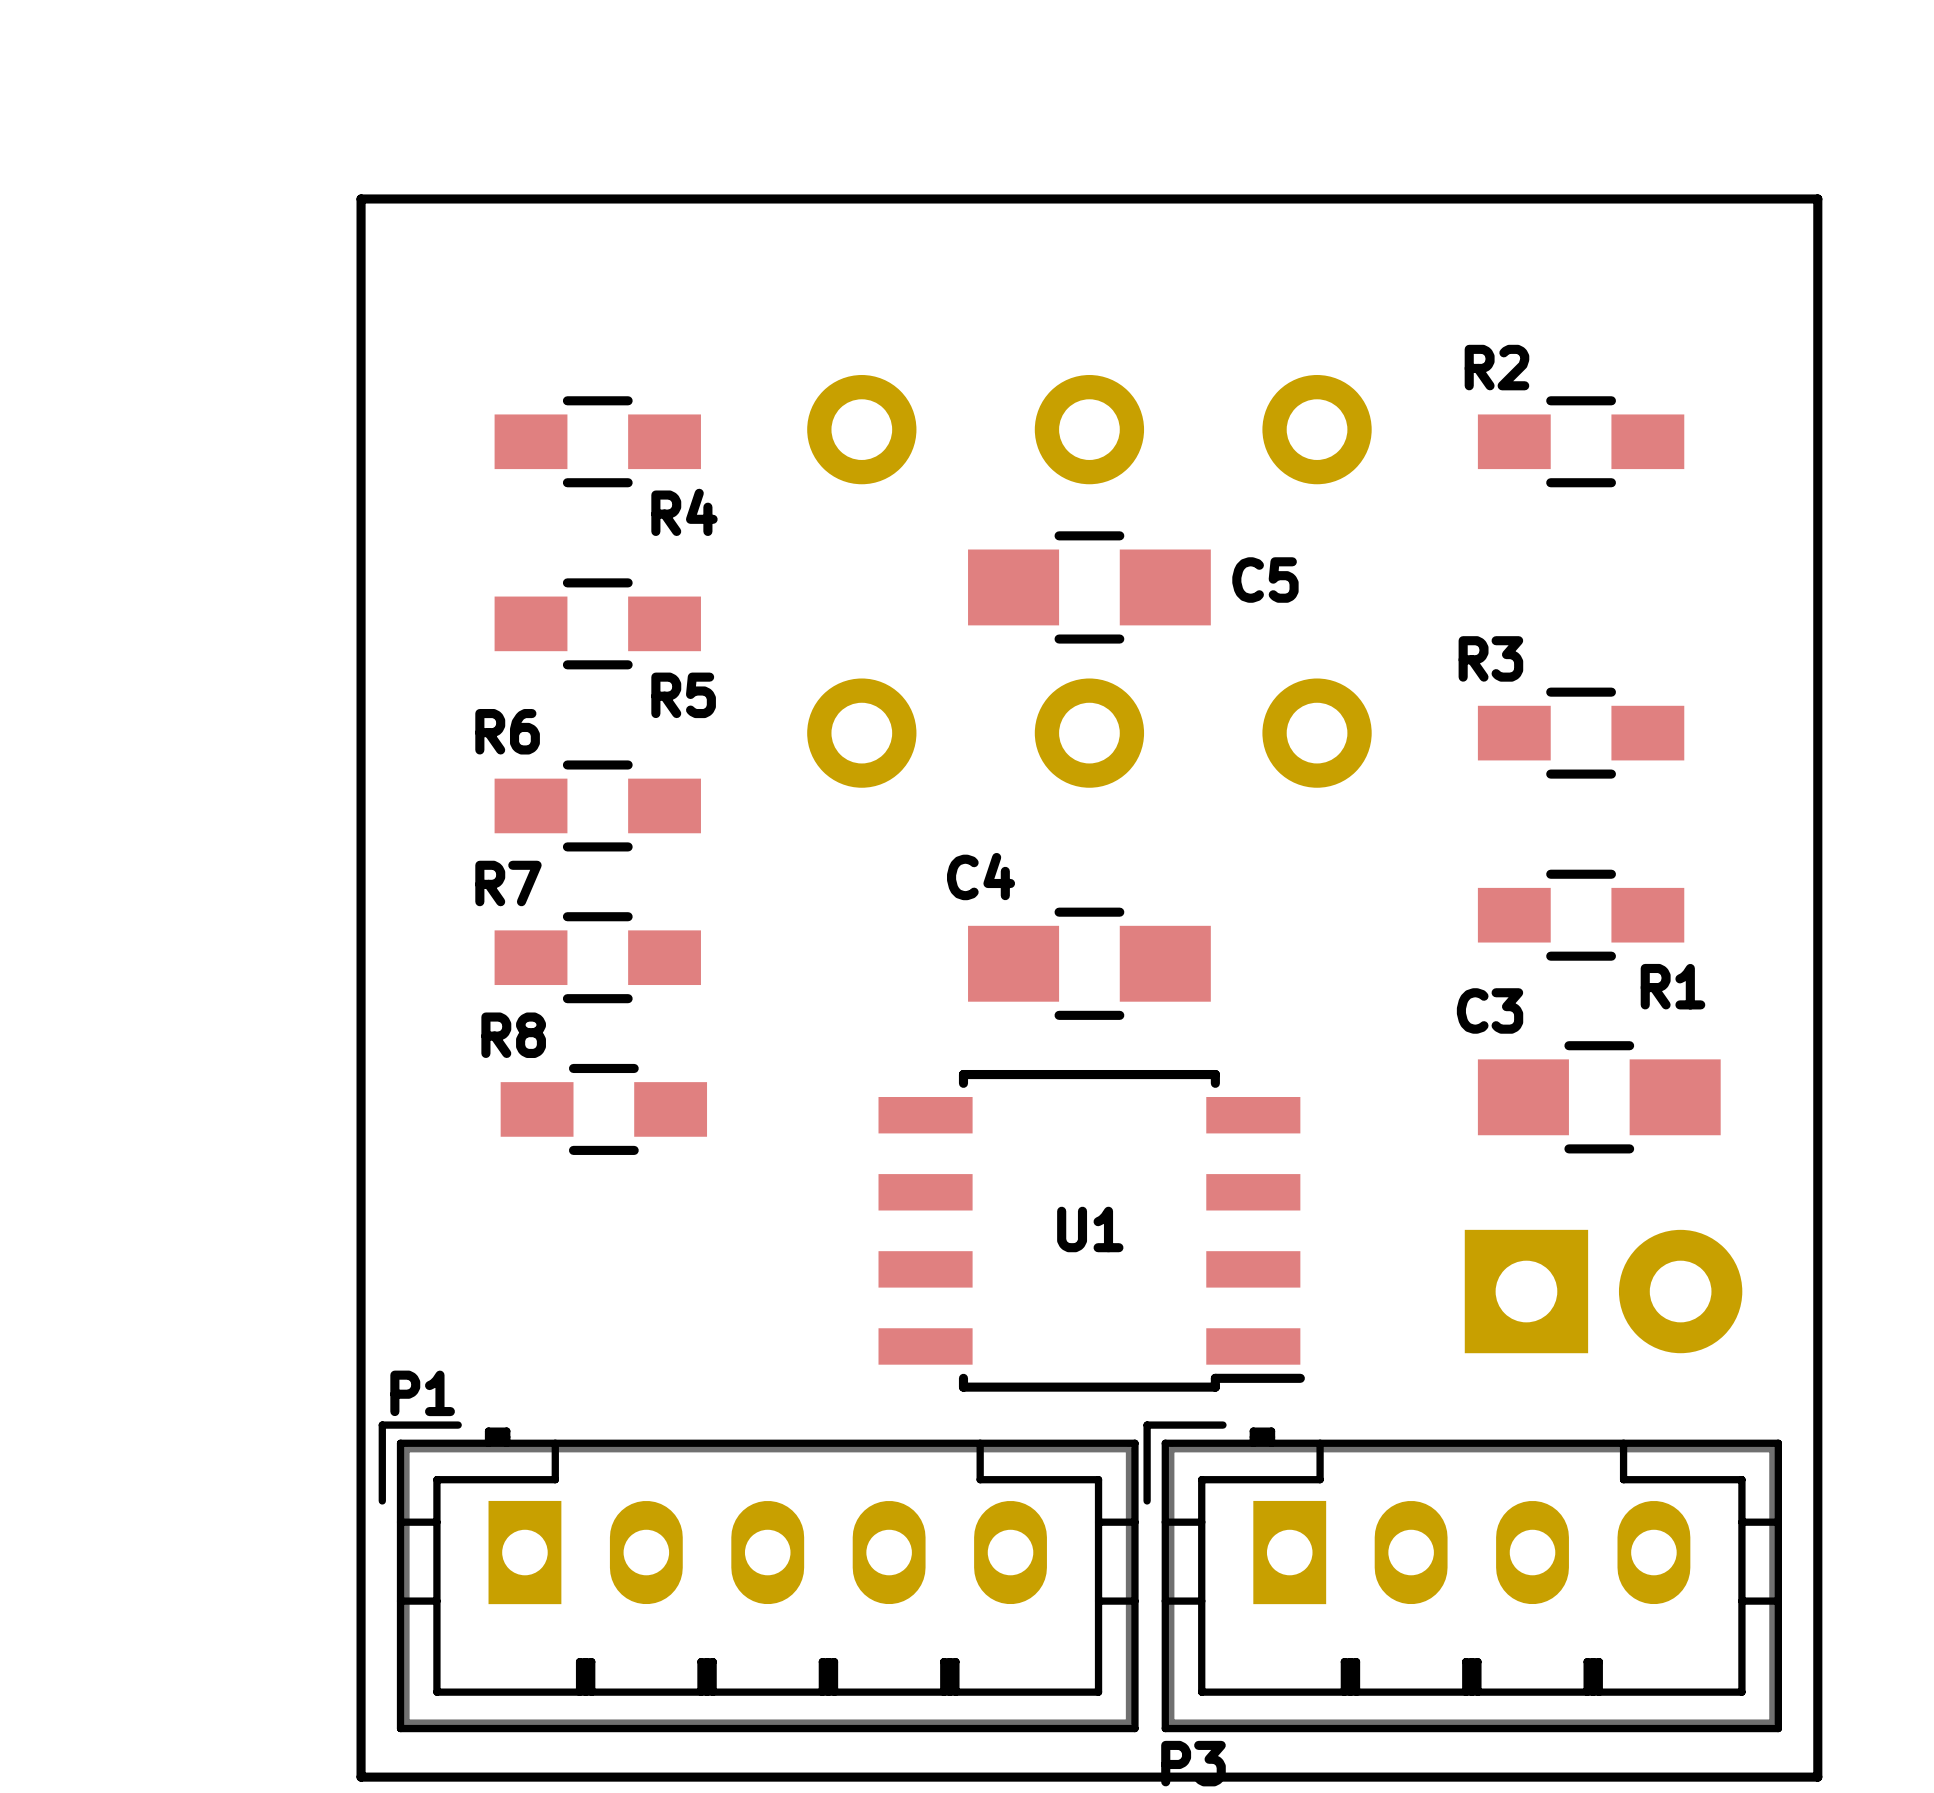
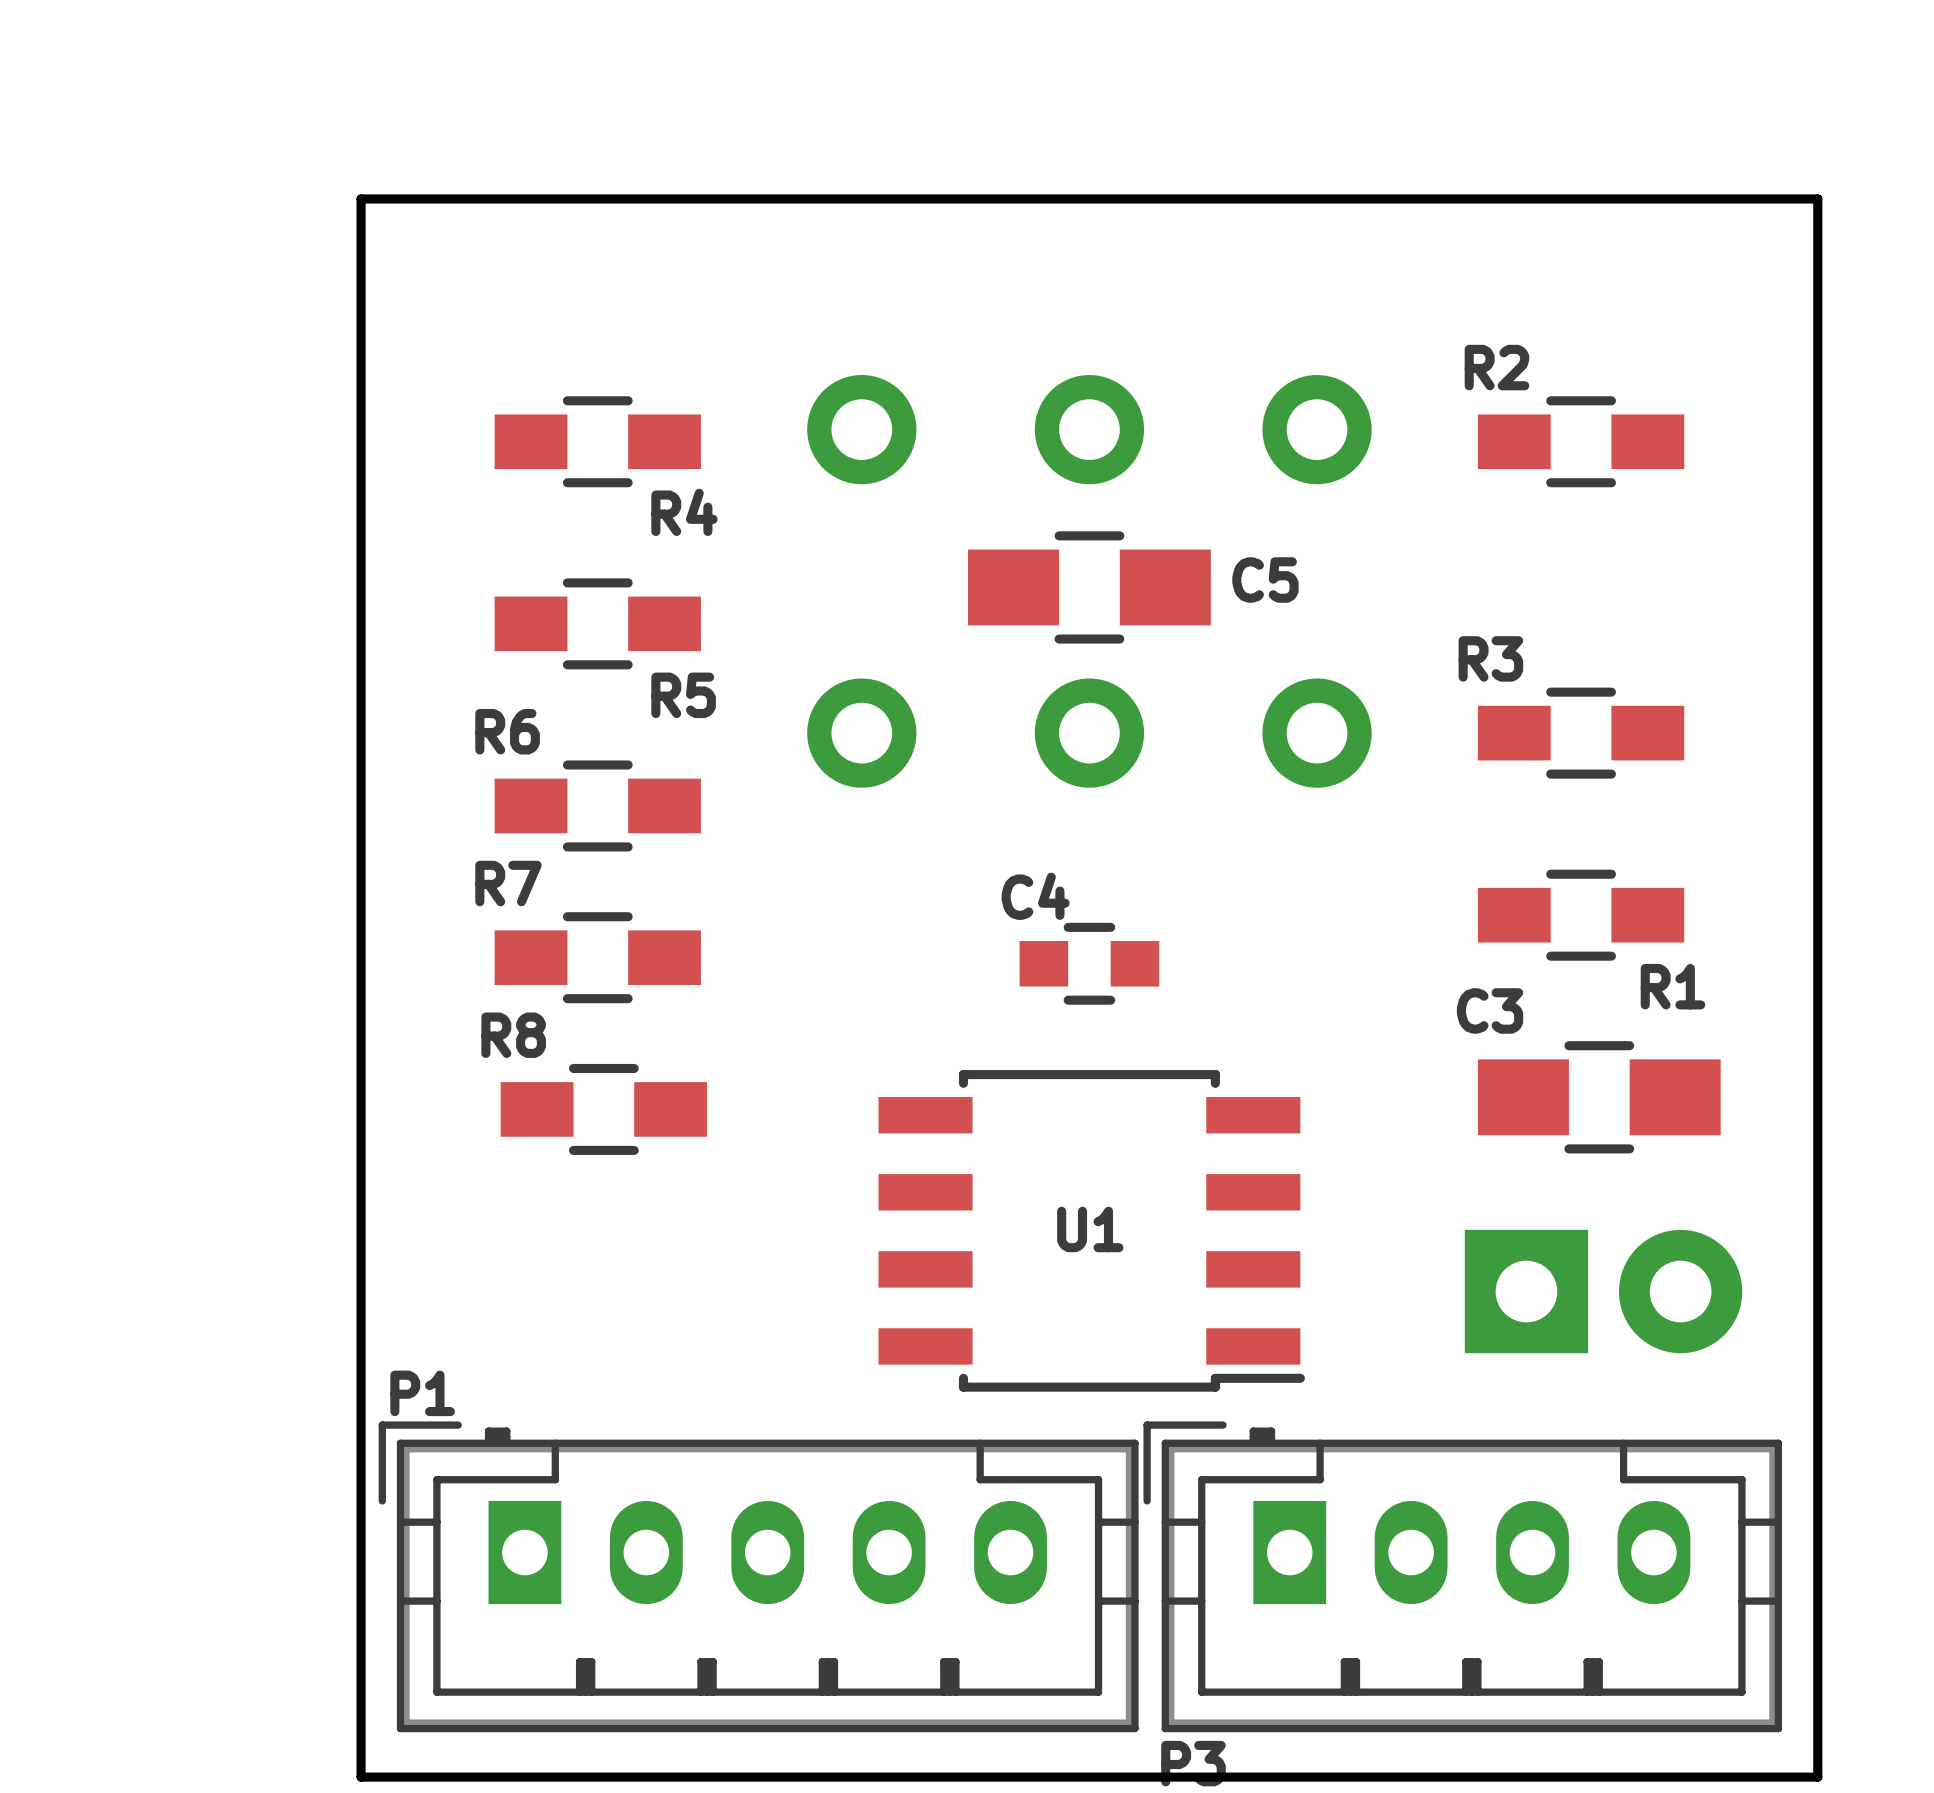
C4 name position: C4 (981, 876) -> C4 (1035, 896)
C4 footprint: [968, 907, 1211, 1020] -> [1019, 922, 1160, 1005]

